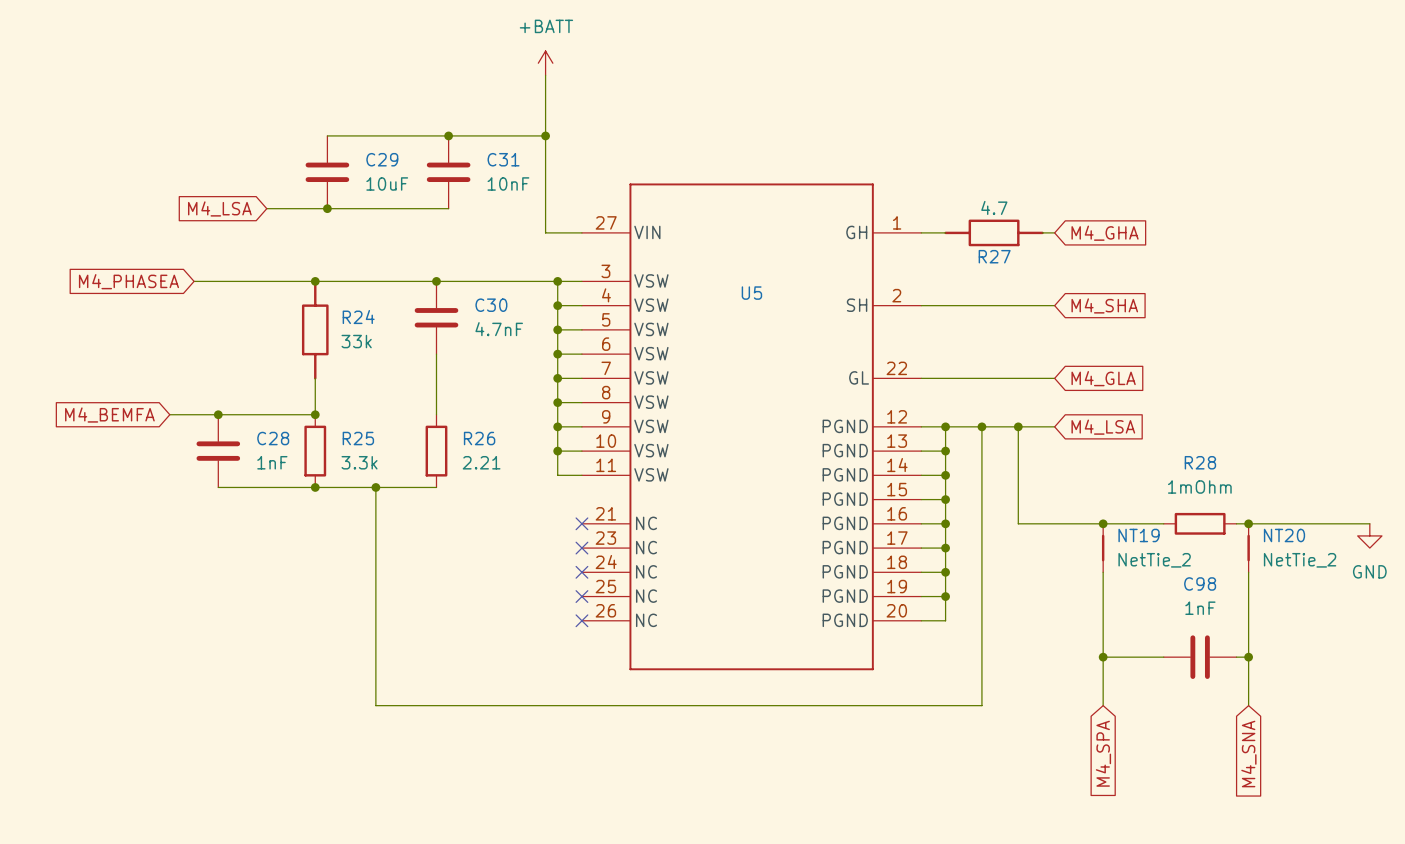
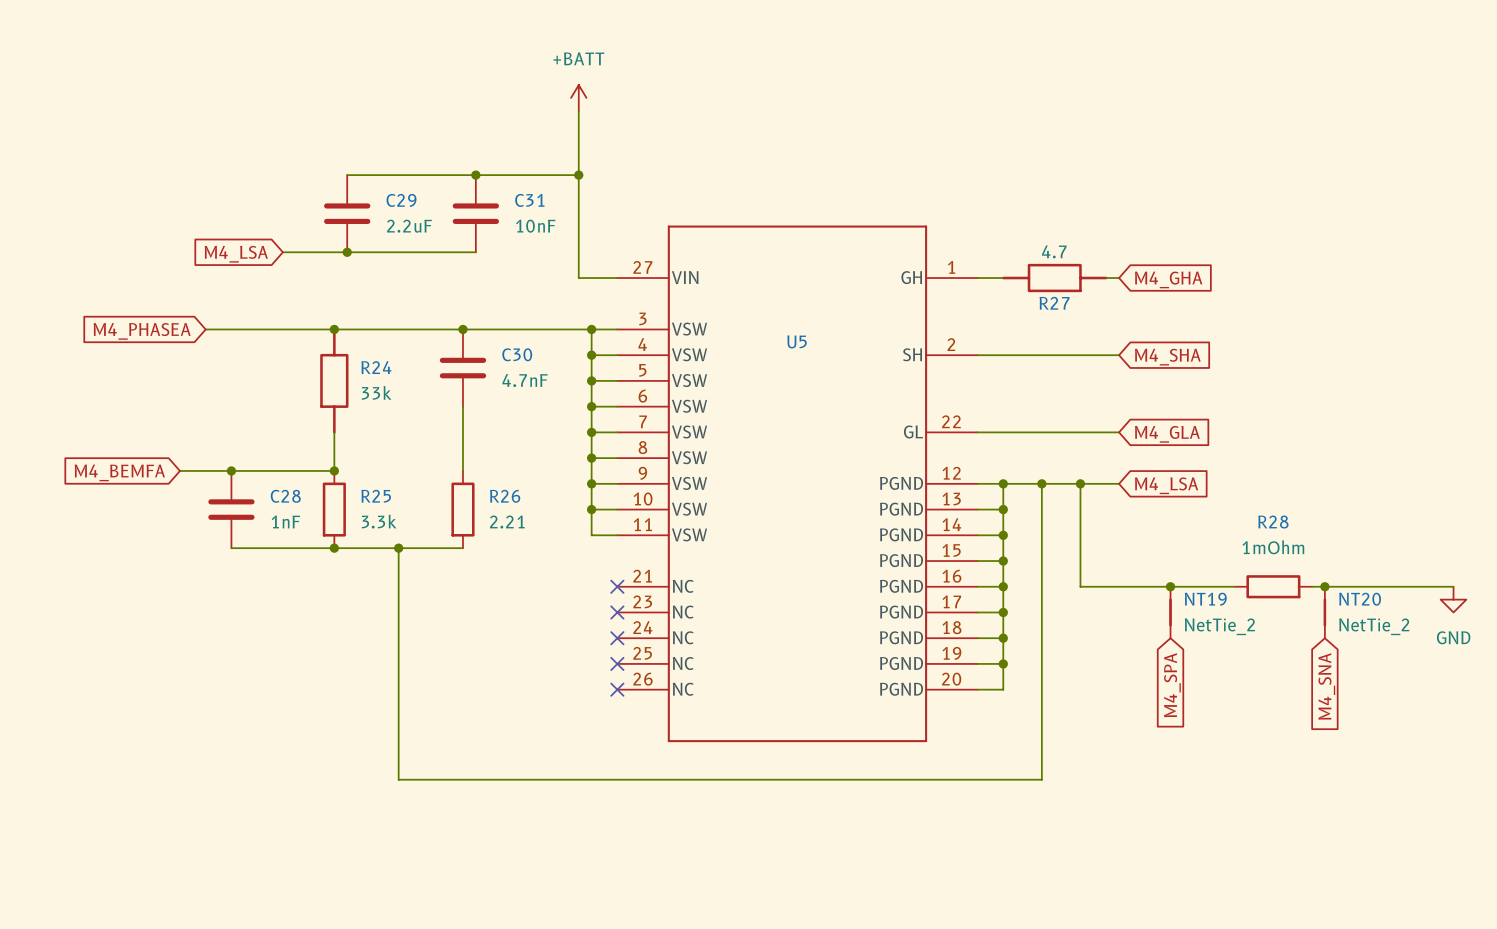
C29 value: 10uF (387, 183) -> 2.2uF (409, 226)
wire: (1103, 572) (1103, 705) -> none
wire: (1248, 572) (1248, 705) -> none
wire: (1103, 657) (1163, 657) -> none
junction: (1103, 657) -> none
C98: 1nF (1200, 657) -> none
wire: (1236, 657) (1248, 657) -> none
junction: (1248, 657) -> none
global label position: M4_SPA (1103, 753) -> M4_SPA (1172, 685)
global label position: M4_SNA (1248, 754) -> M4_SNA (1326, 686)

